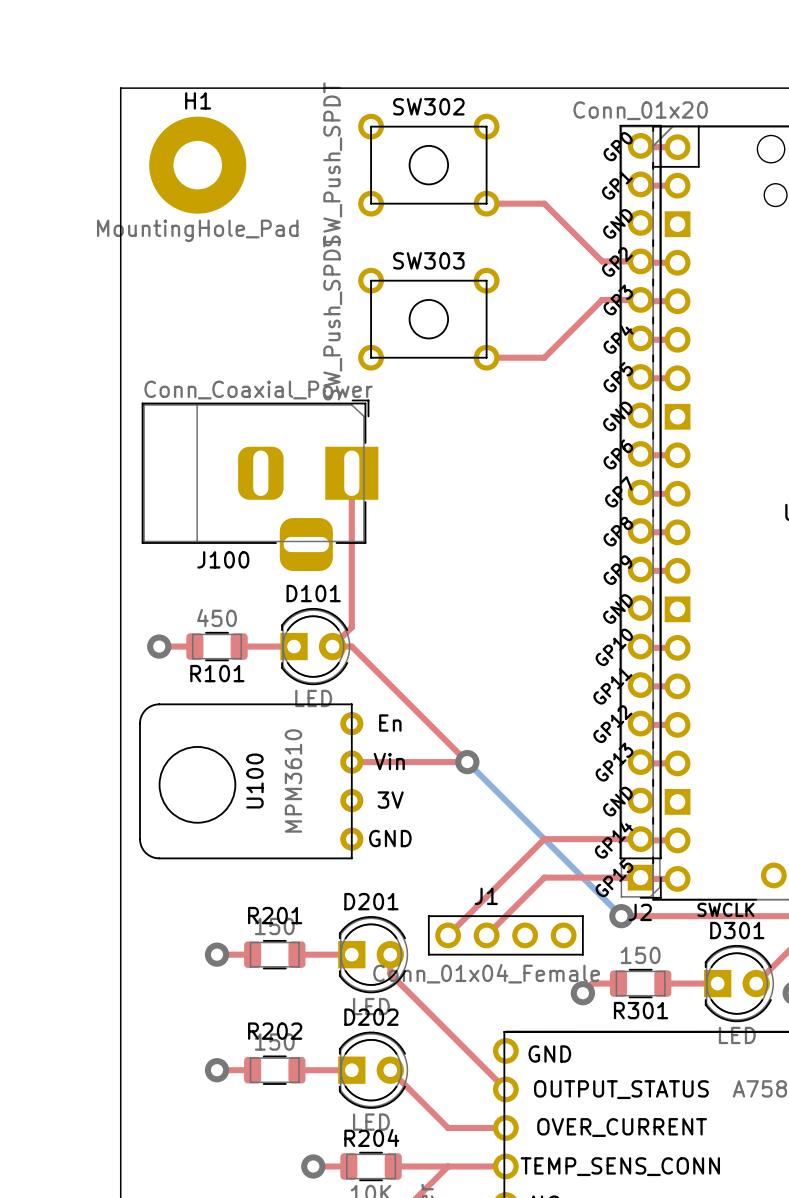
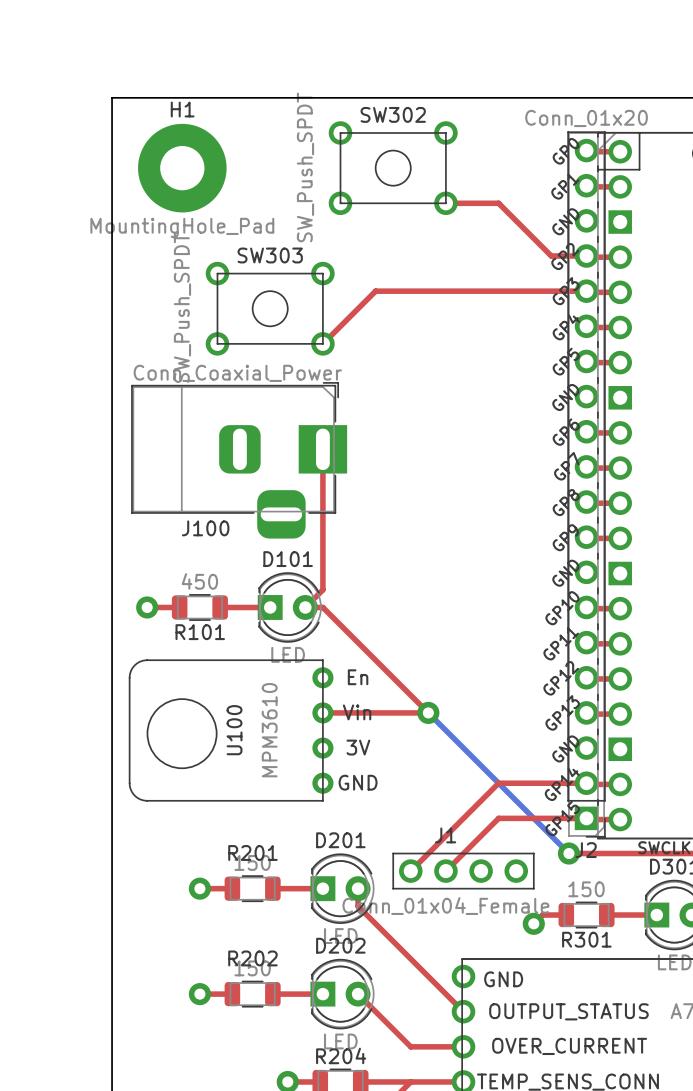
top track: (602, 299) (544, 357) (486, 357) -> (551, 291) (375, 291) (322, 343)
SW303 position: (428, 319) -> (270, 308)

